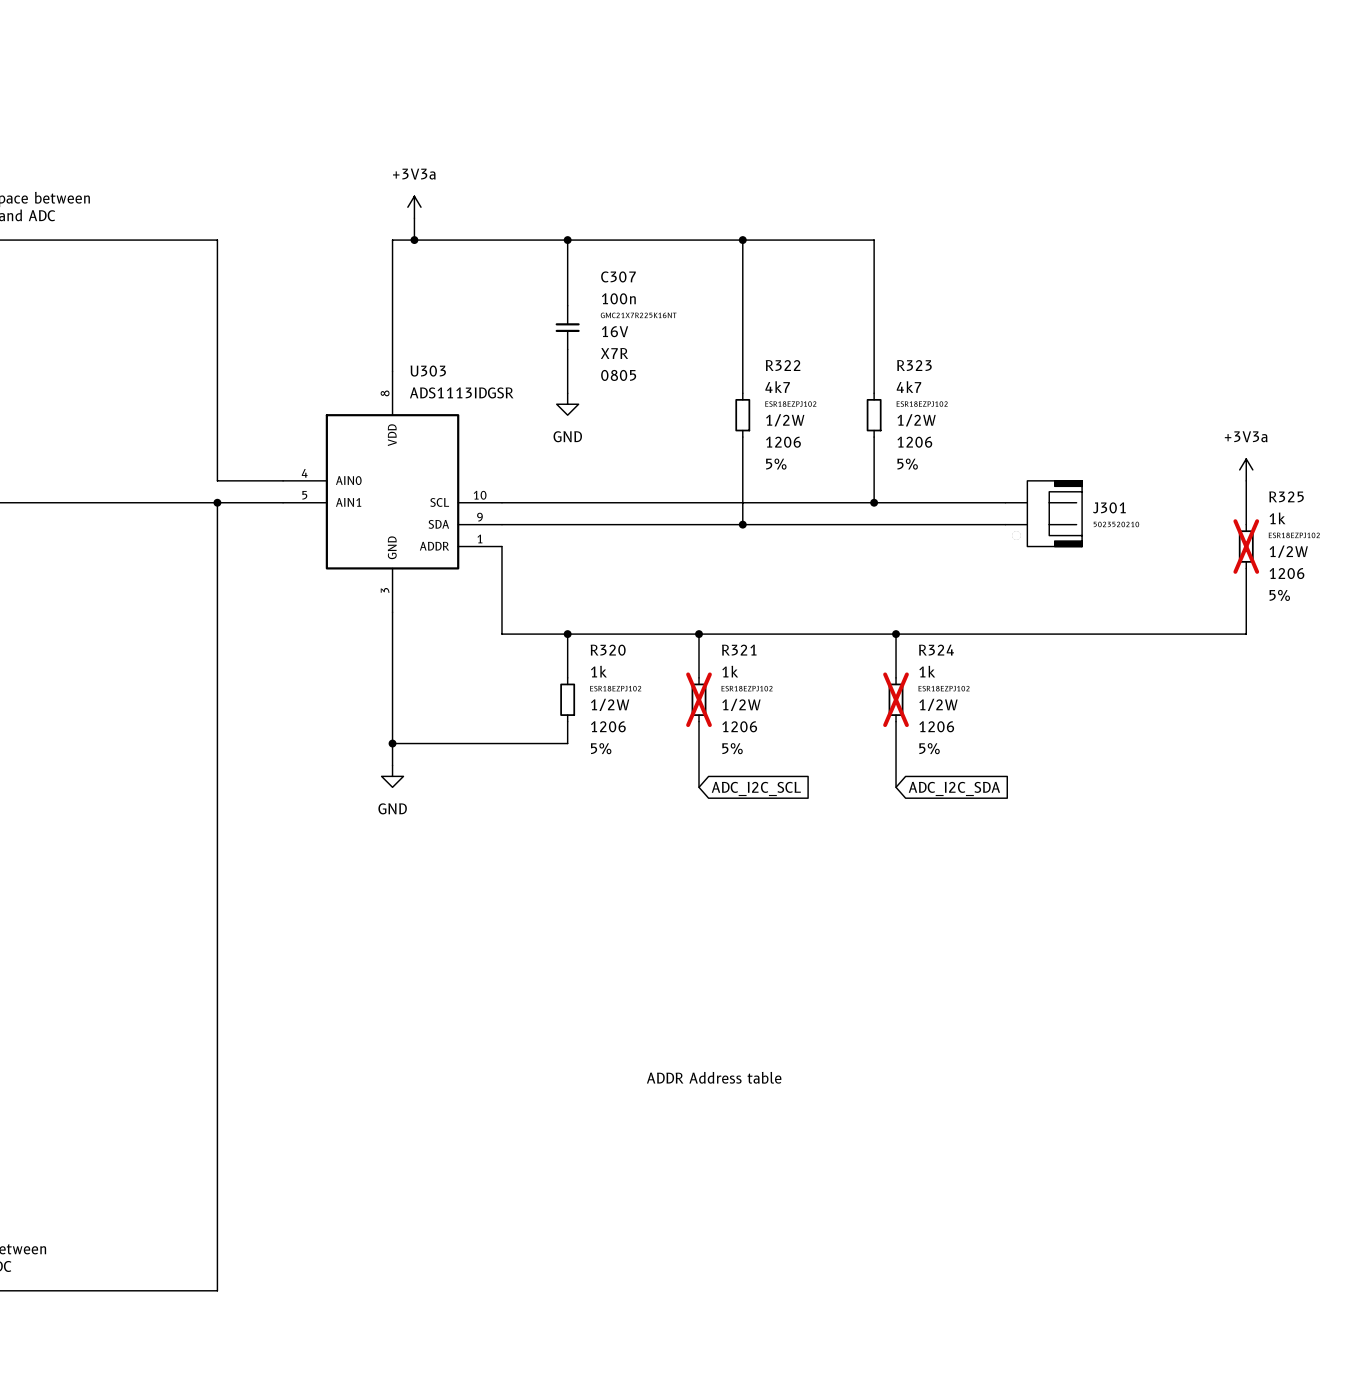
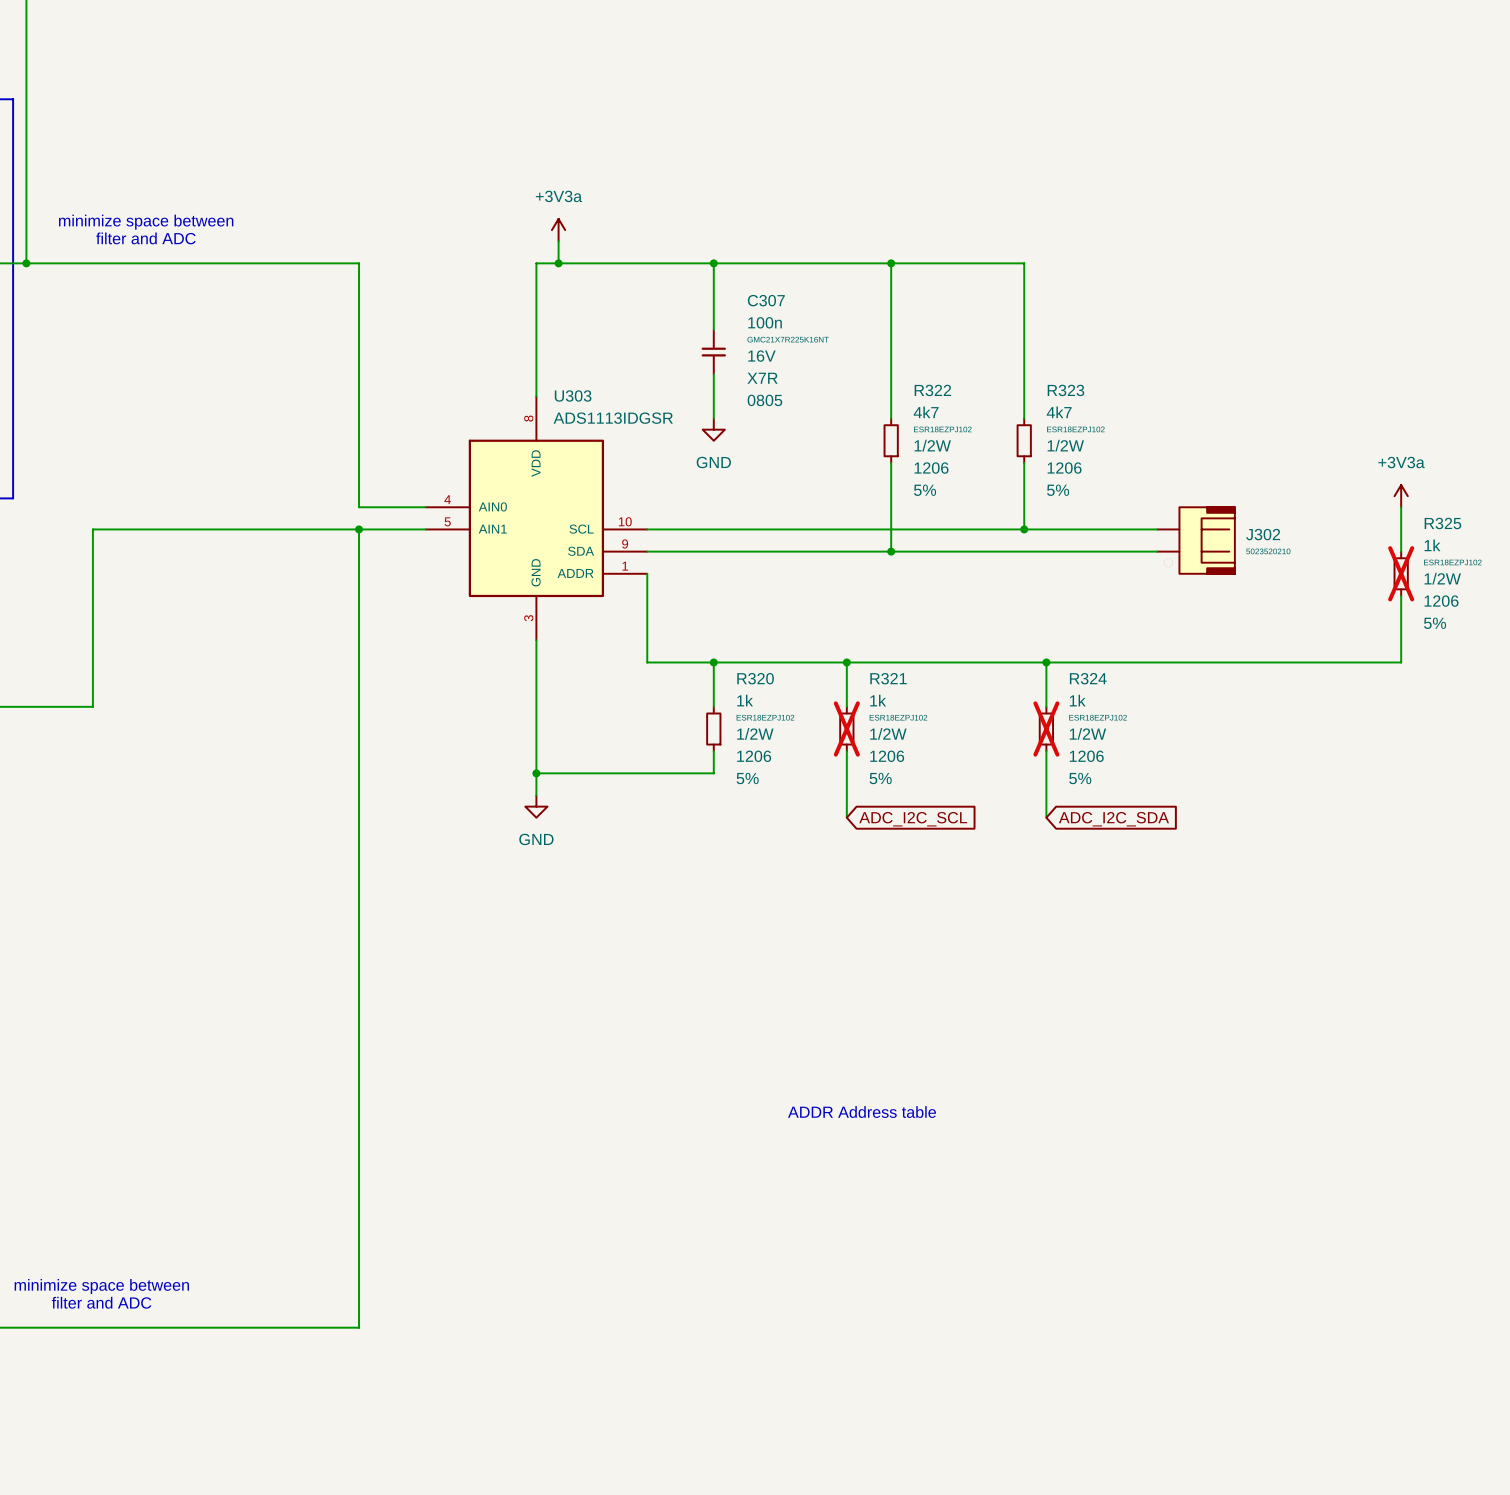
J301 name: J301 (1109, 507) -> J302 (1263, 534)

